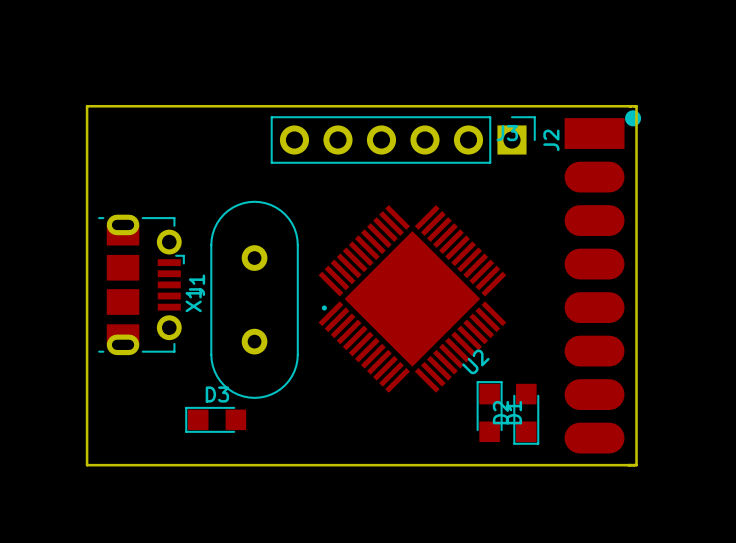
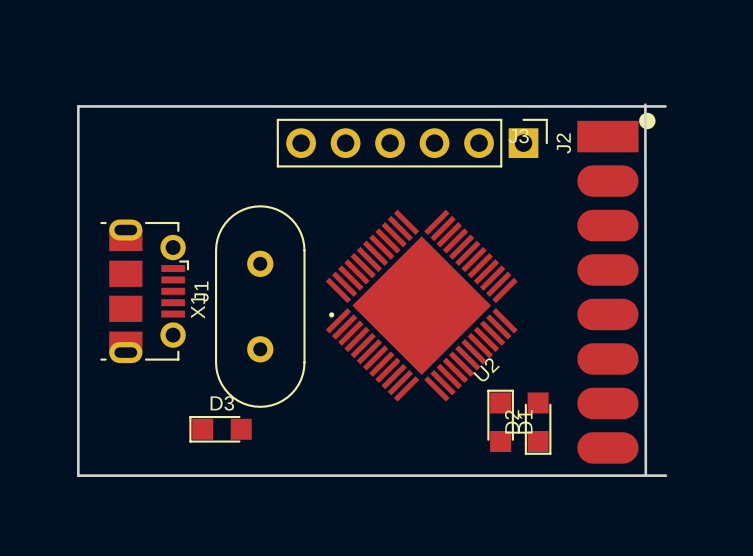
board edge: none -> (645, 104) (645, 473)
board edge: (87, 465) (87, 106) (636, 106) (636, 465) -> (89, 475) (78, 475) (78, 106) (665, 106)
board edge: none -> (650, 475) (665, 475)

